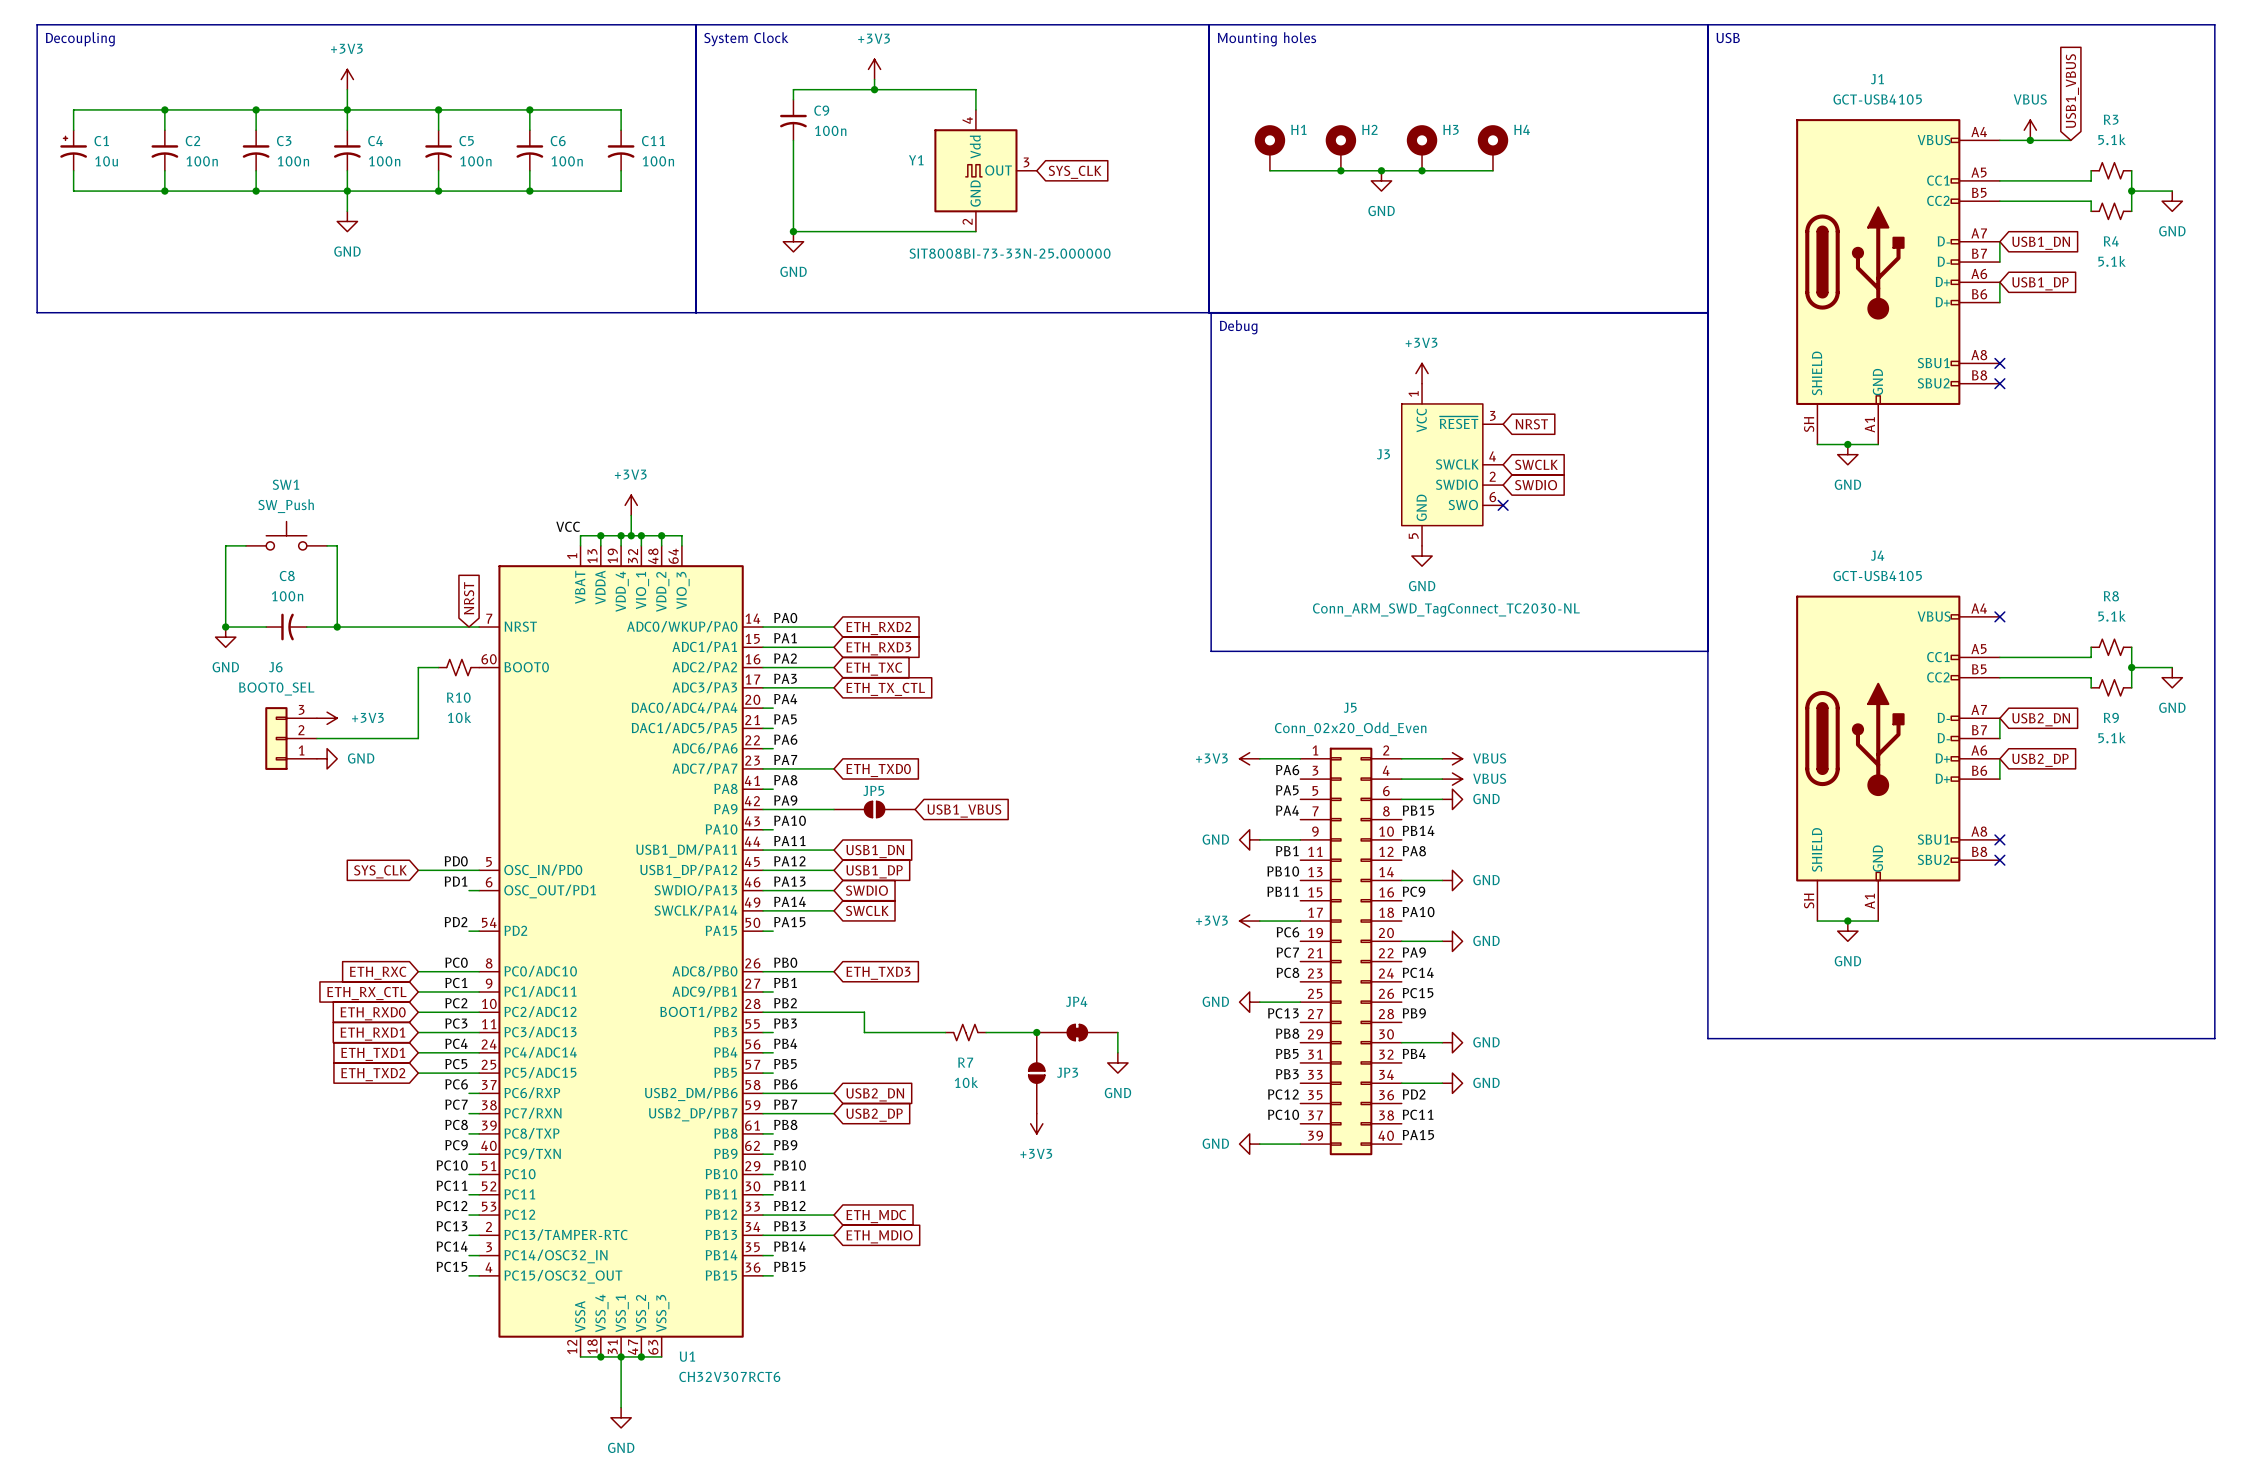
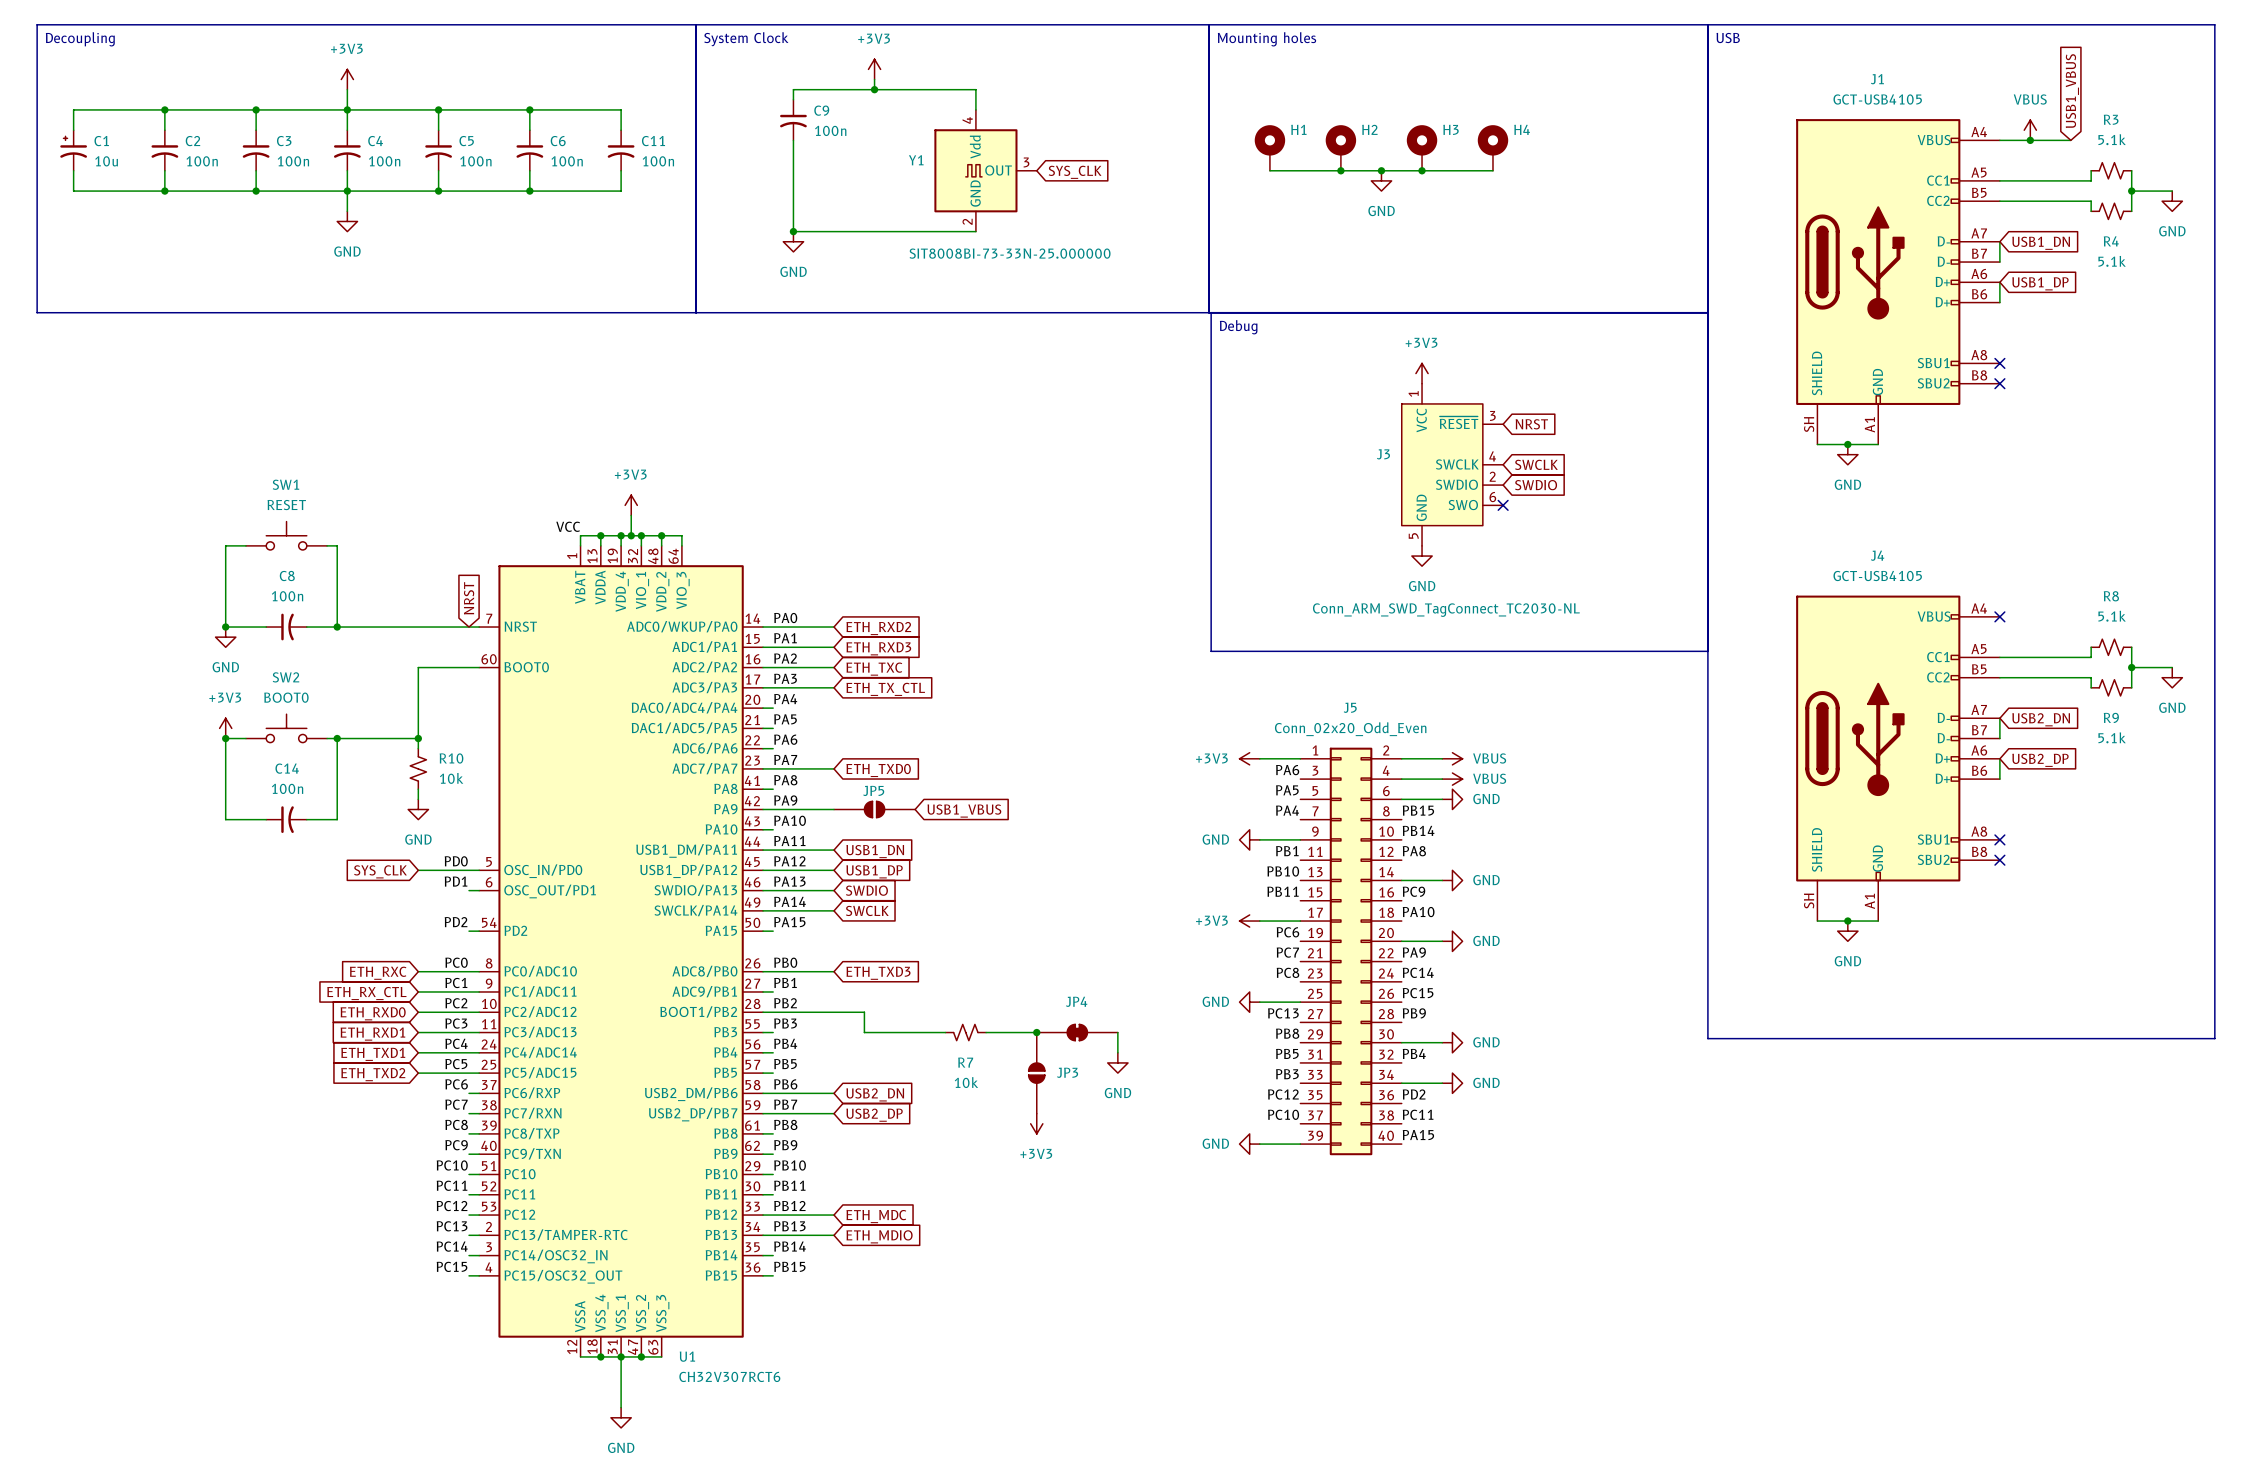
SW1 value: SW_Push (286, 506) -> RESET (286, 505)
R10 rotation: 0° (458, 667) -> 90° clockwise (418, 768)
R10 position: (458, 667) -> (418, 768)
R10 name position: R10 (458, 697) -> R10 (451, 758)
power symbol text position: +3V3 (367, 717) -> +3V3 (225, 697)
R10 value position: 10k (459, 717) -> 10k (451, 778)
power symbol rotation: 0° (327, 718) -> 90° counterclockwise (225, 728)
power symbol position: +3V3 (327, 718) -> +3V3 (225, 728)
SW2: none -> BOOT0 (286, 728)
junction: none -> (225, 738)
wire: none -> (245, 738) (225, 738) (225, 819) (266, 819)
J6: BOOT0_SEL (291, 738) -> none
wire: none -> (337, 738) (337, 819) (306, 819)
junction: none -> (337, 738)
wire: none -> (418, 738) (418, 748)
junction: none -> (418, 738)
power symbol rotation: 0° (327, 758) -> 90° clockwise (418, 809)
power symbol position: GND (327, 758) -> GND (418, 809)
wire: none -> (418, 789) (418, 799)
C14: none -> 100n (286, 819)

